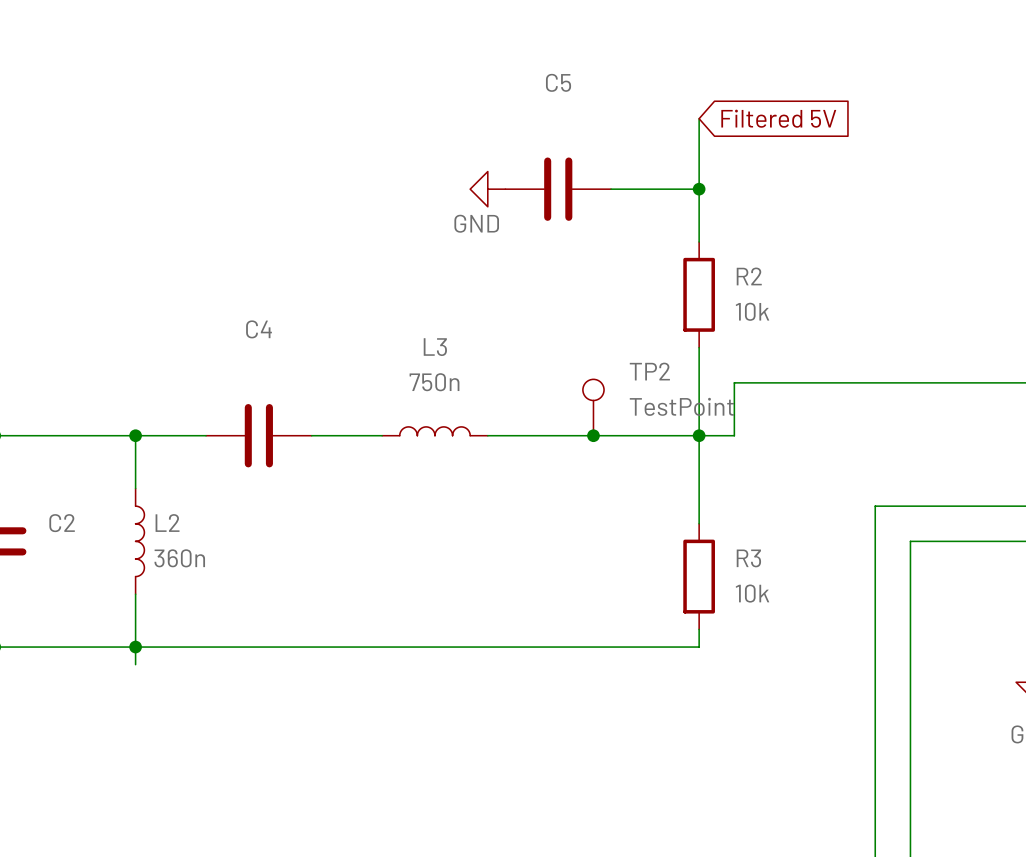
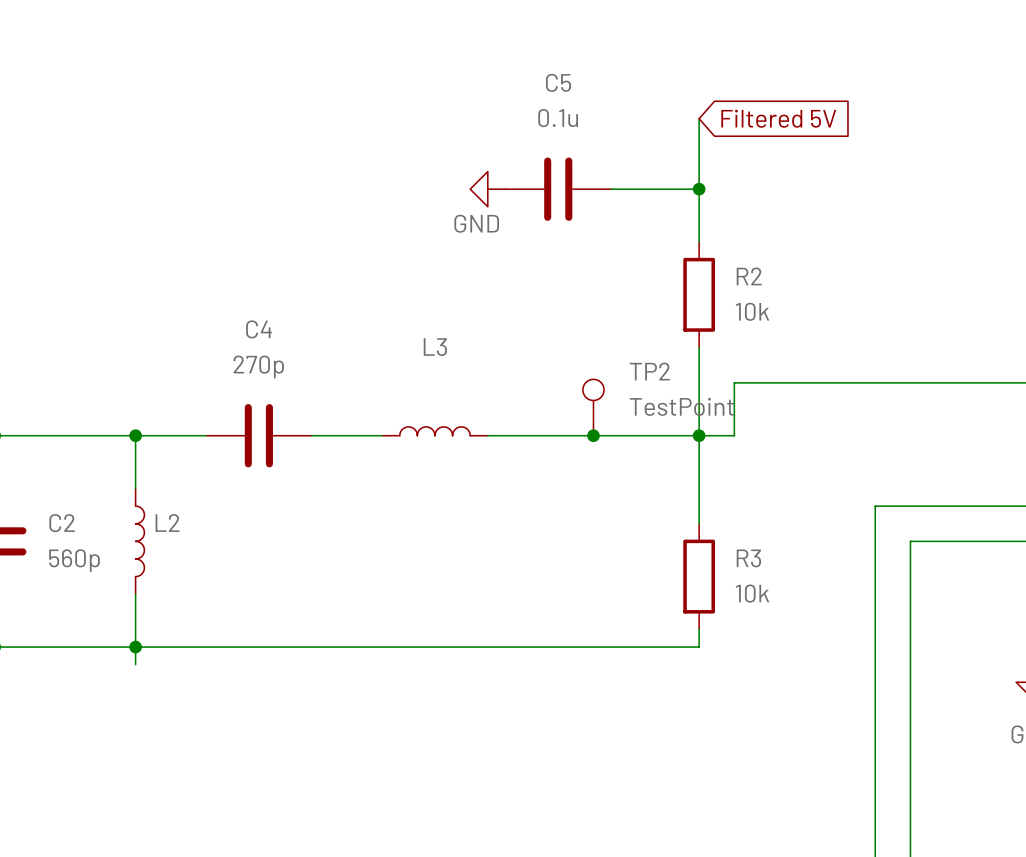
C5 value: none -> 0.1u (558, 118)
C4 value: none -> 270p (258, 366)
L3 value: 750n (434, 382) -> none
L2 value: 360n (179, 558) -> none
C2 value: none -> 560p (74, 560)

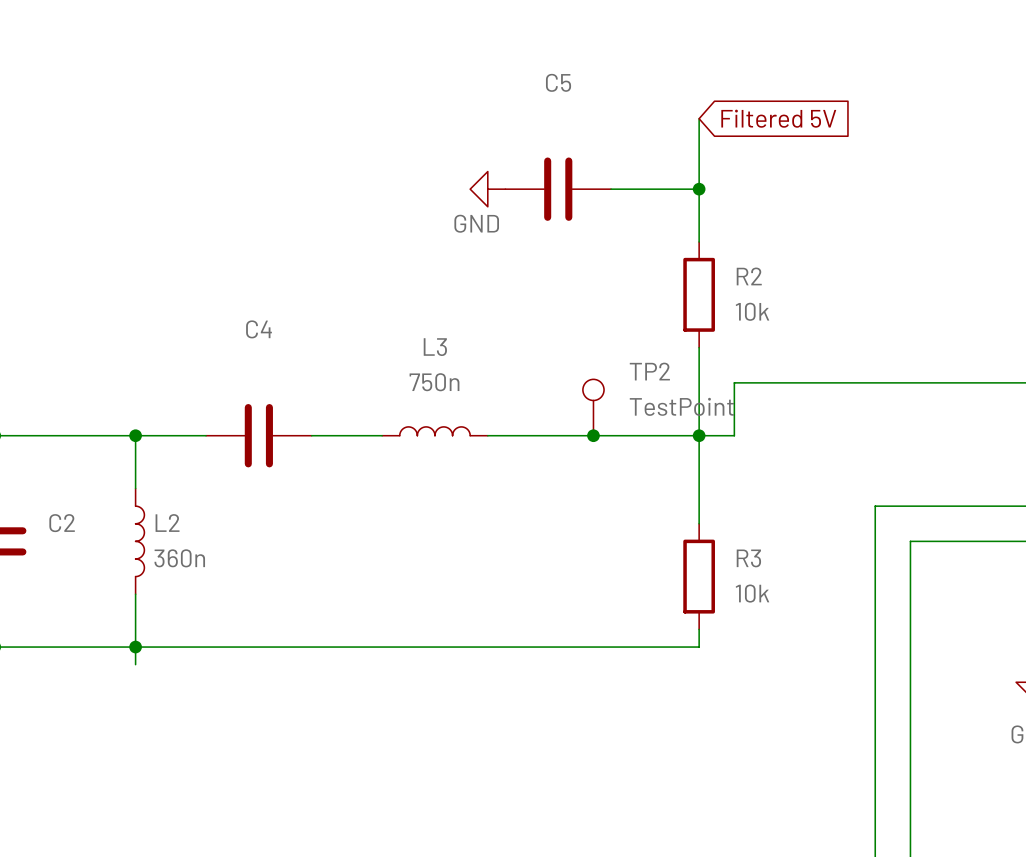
C5 value: 0.1u (558, 118) -> none
C4 value: 270p (258, 366) -> none
L3 value: none -> 750n (434, 382)
L2 value: none -> 360n (179, 558)
C2 value: 560p (74, 560) -> none

